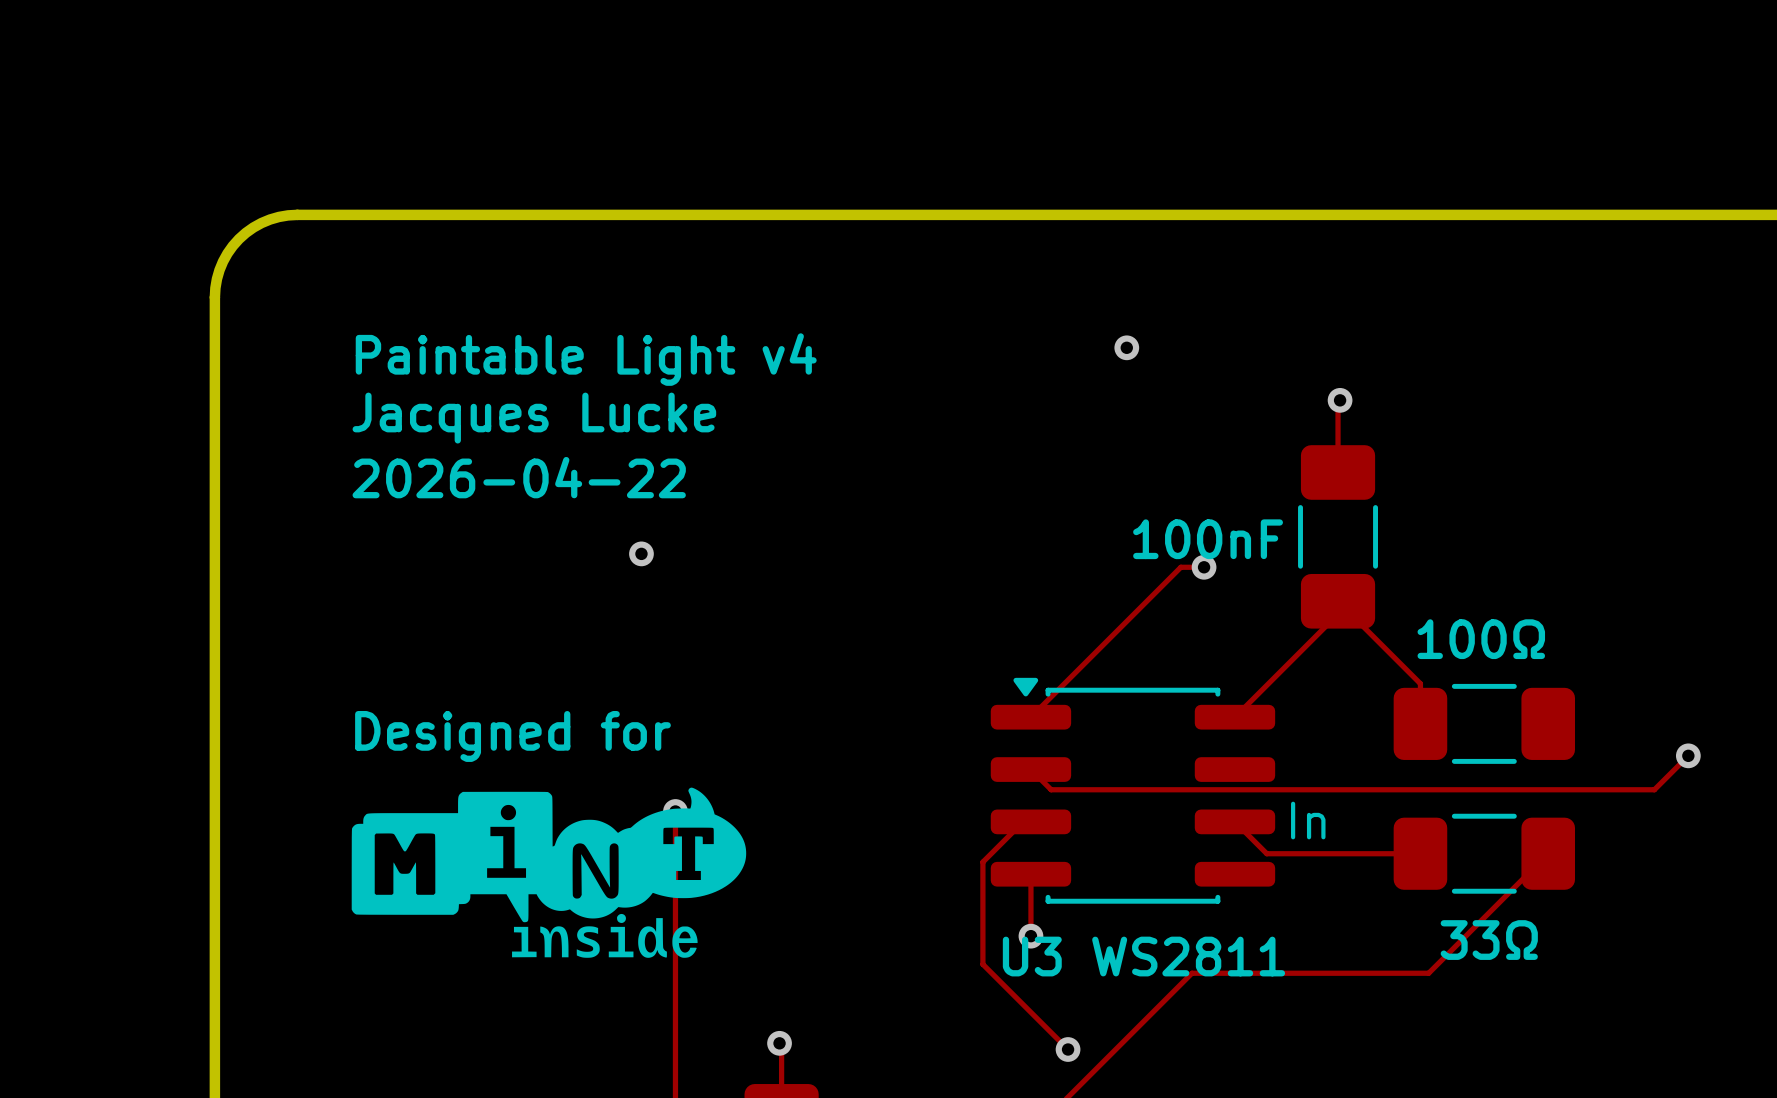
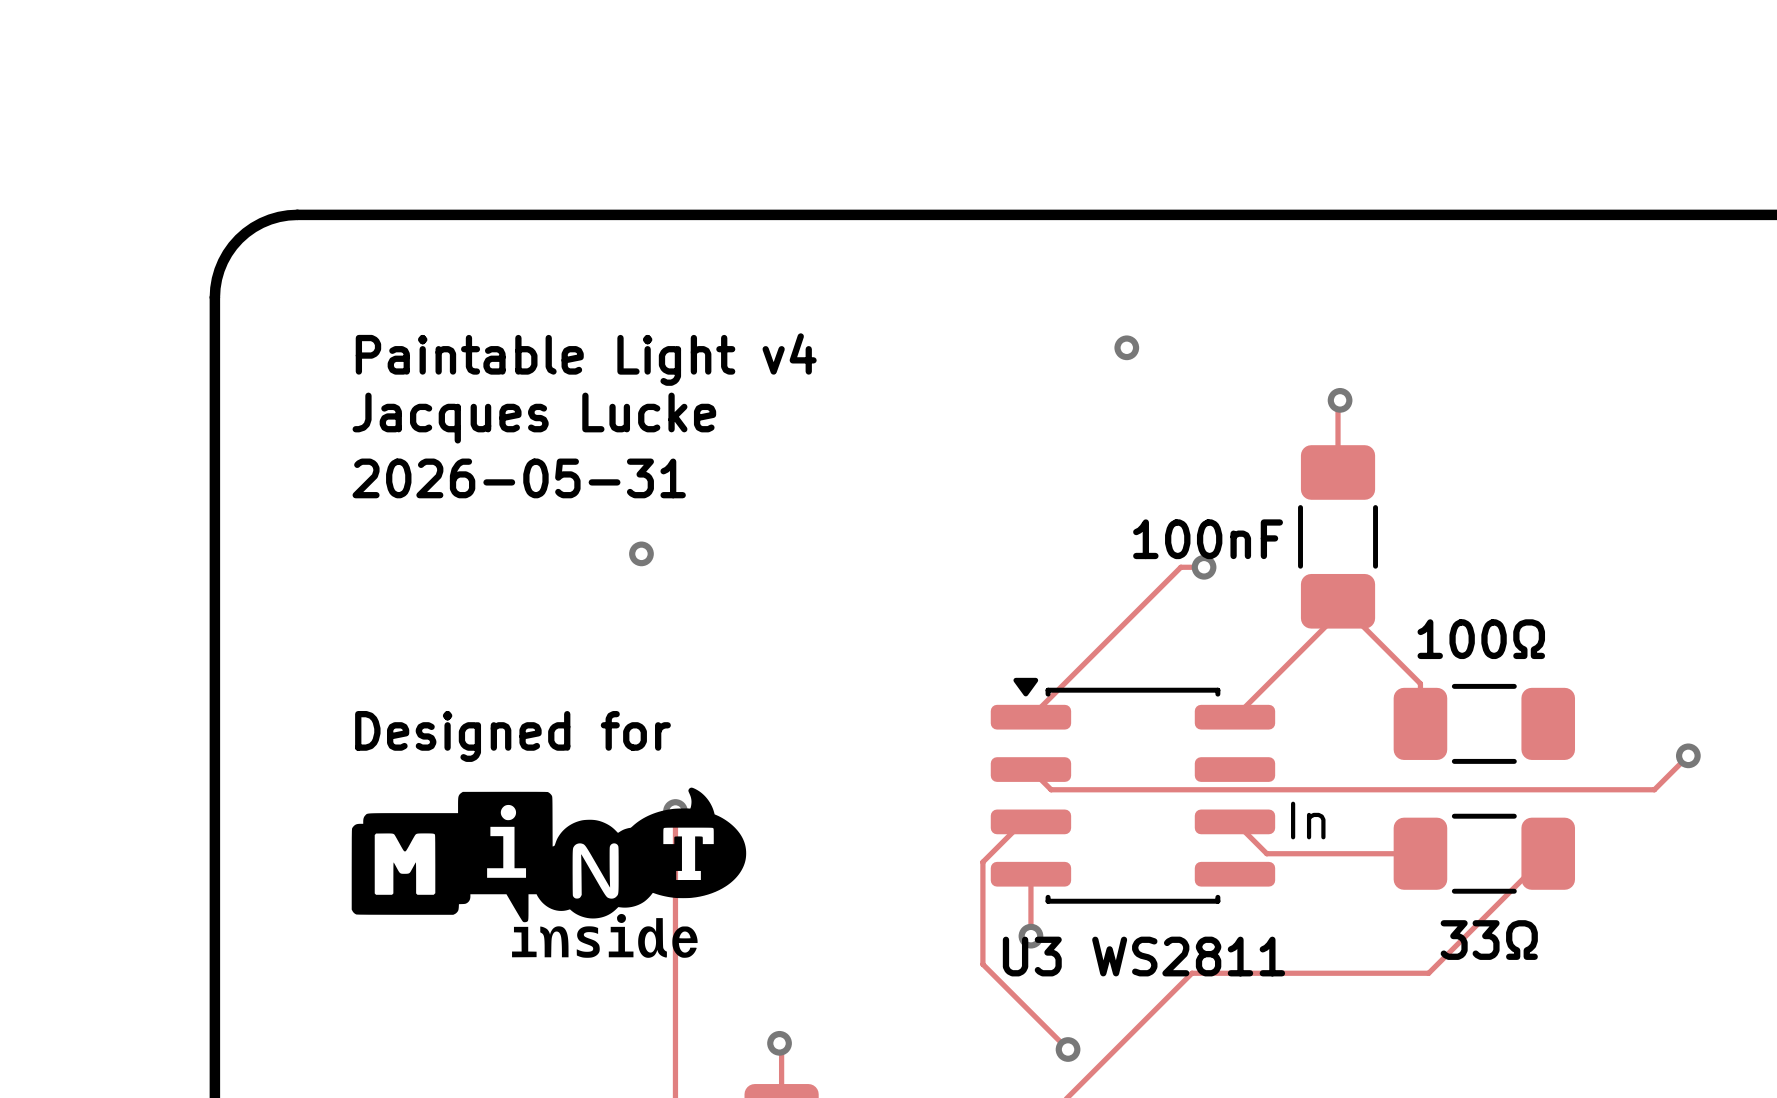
text: 2026-04-22 (519, 477) -> 2026-05-31 (519, 478)

